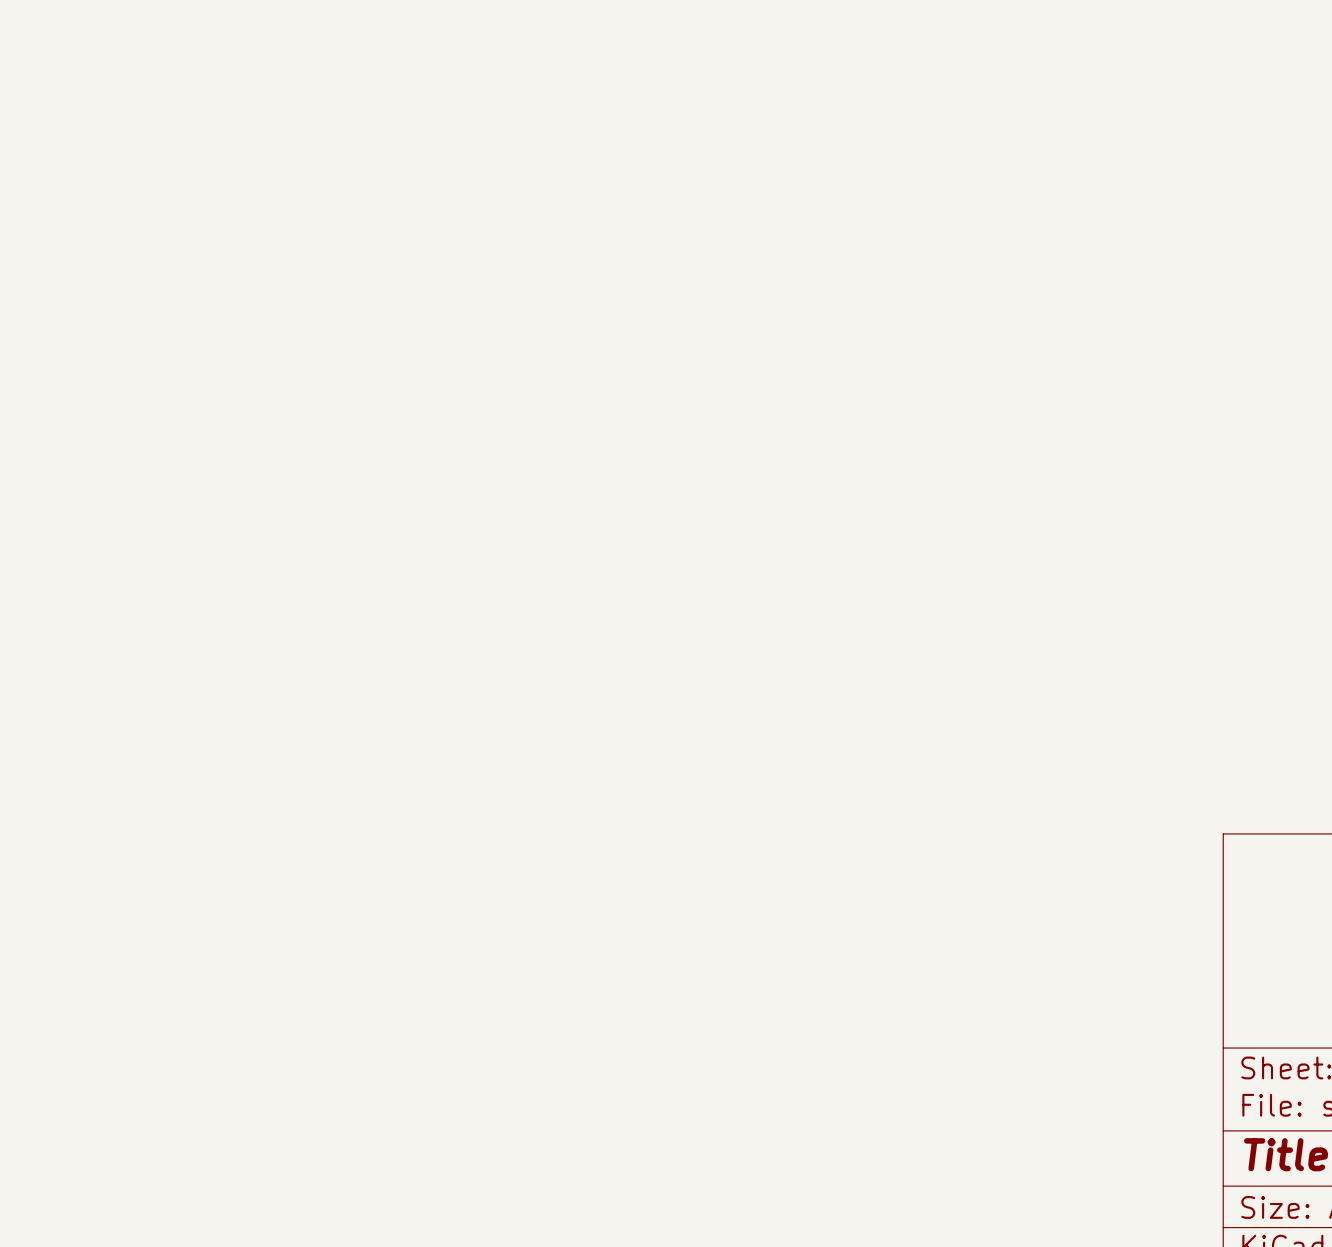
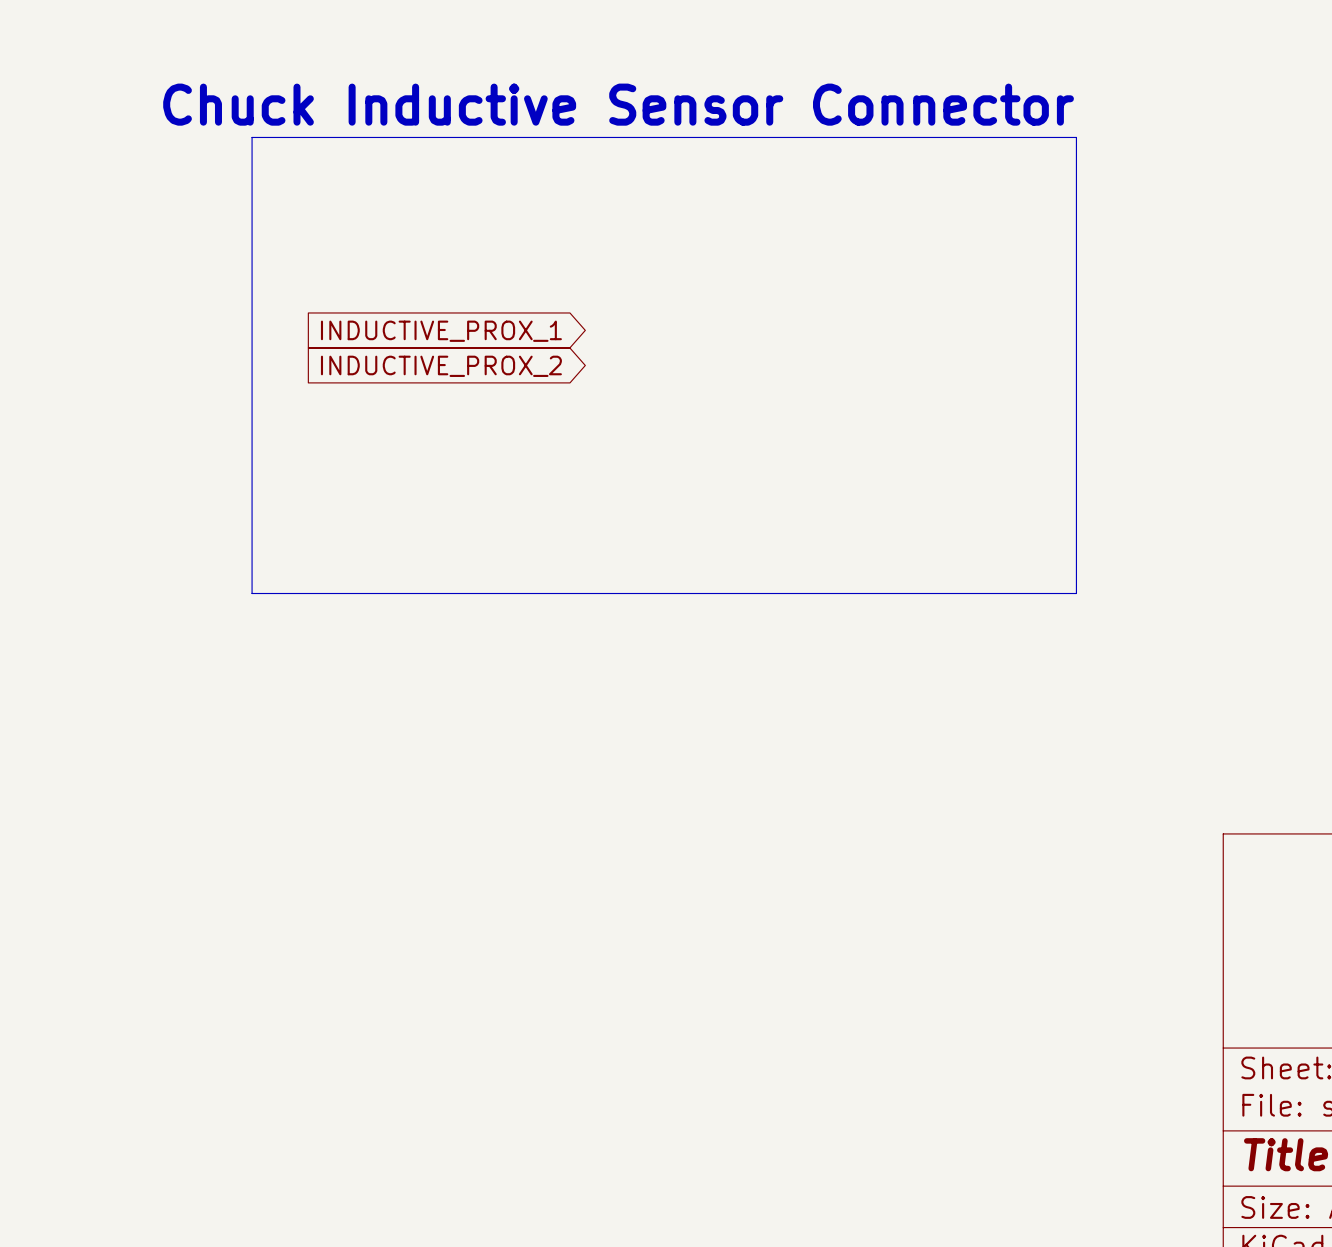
text: none -> Chuck Inductive Sensor Connector (618, 104)
line: none -> (252, 137) (1076, 137) (1076, 593) (252, 593) (252, 137)
global label: none -> INDUCTIVE_PROX_1 (441, 331)
global label: none -> INDUCTIVE_PROX_2 (441, 366)

